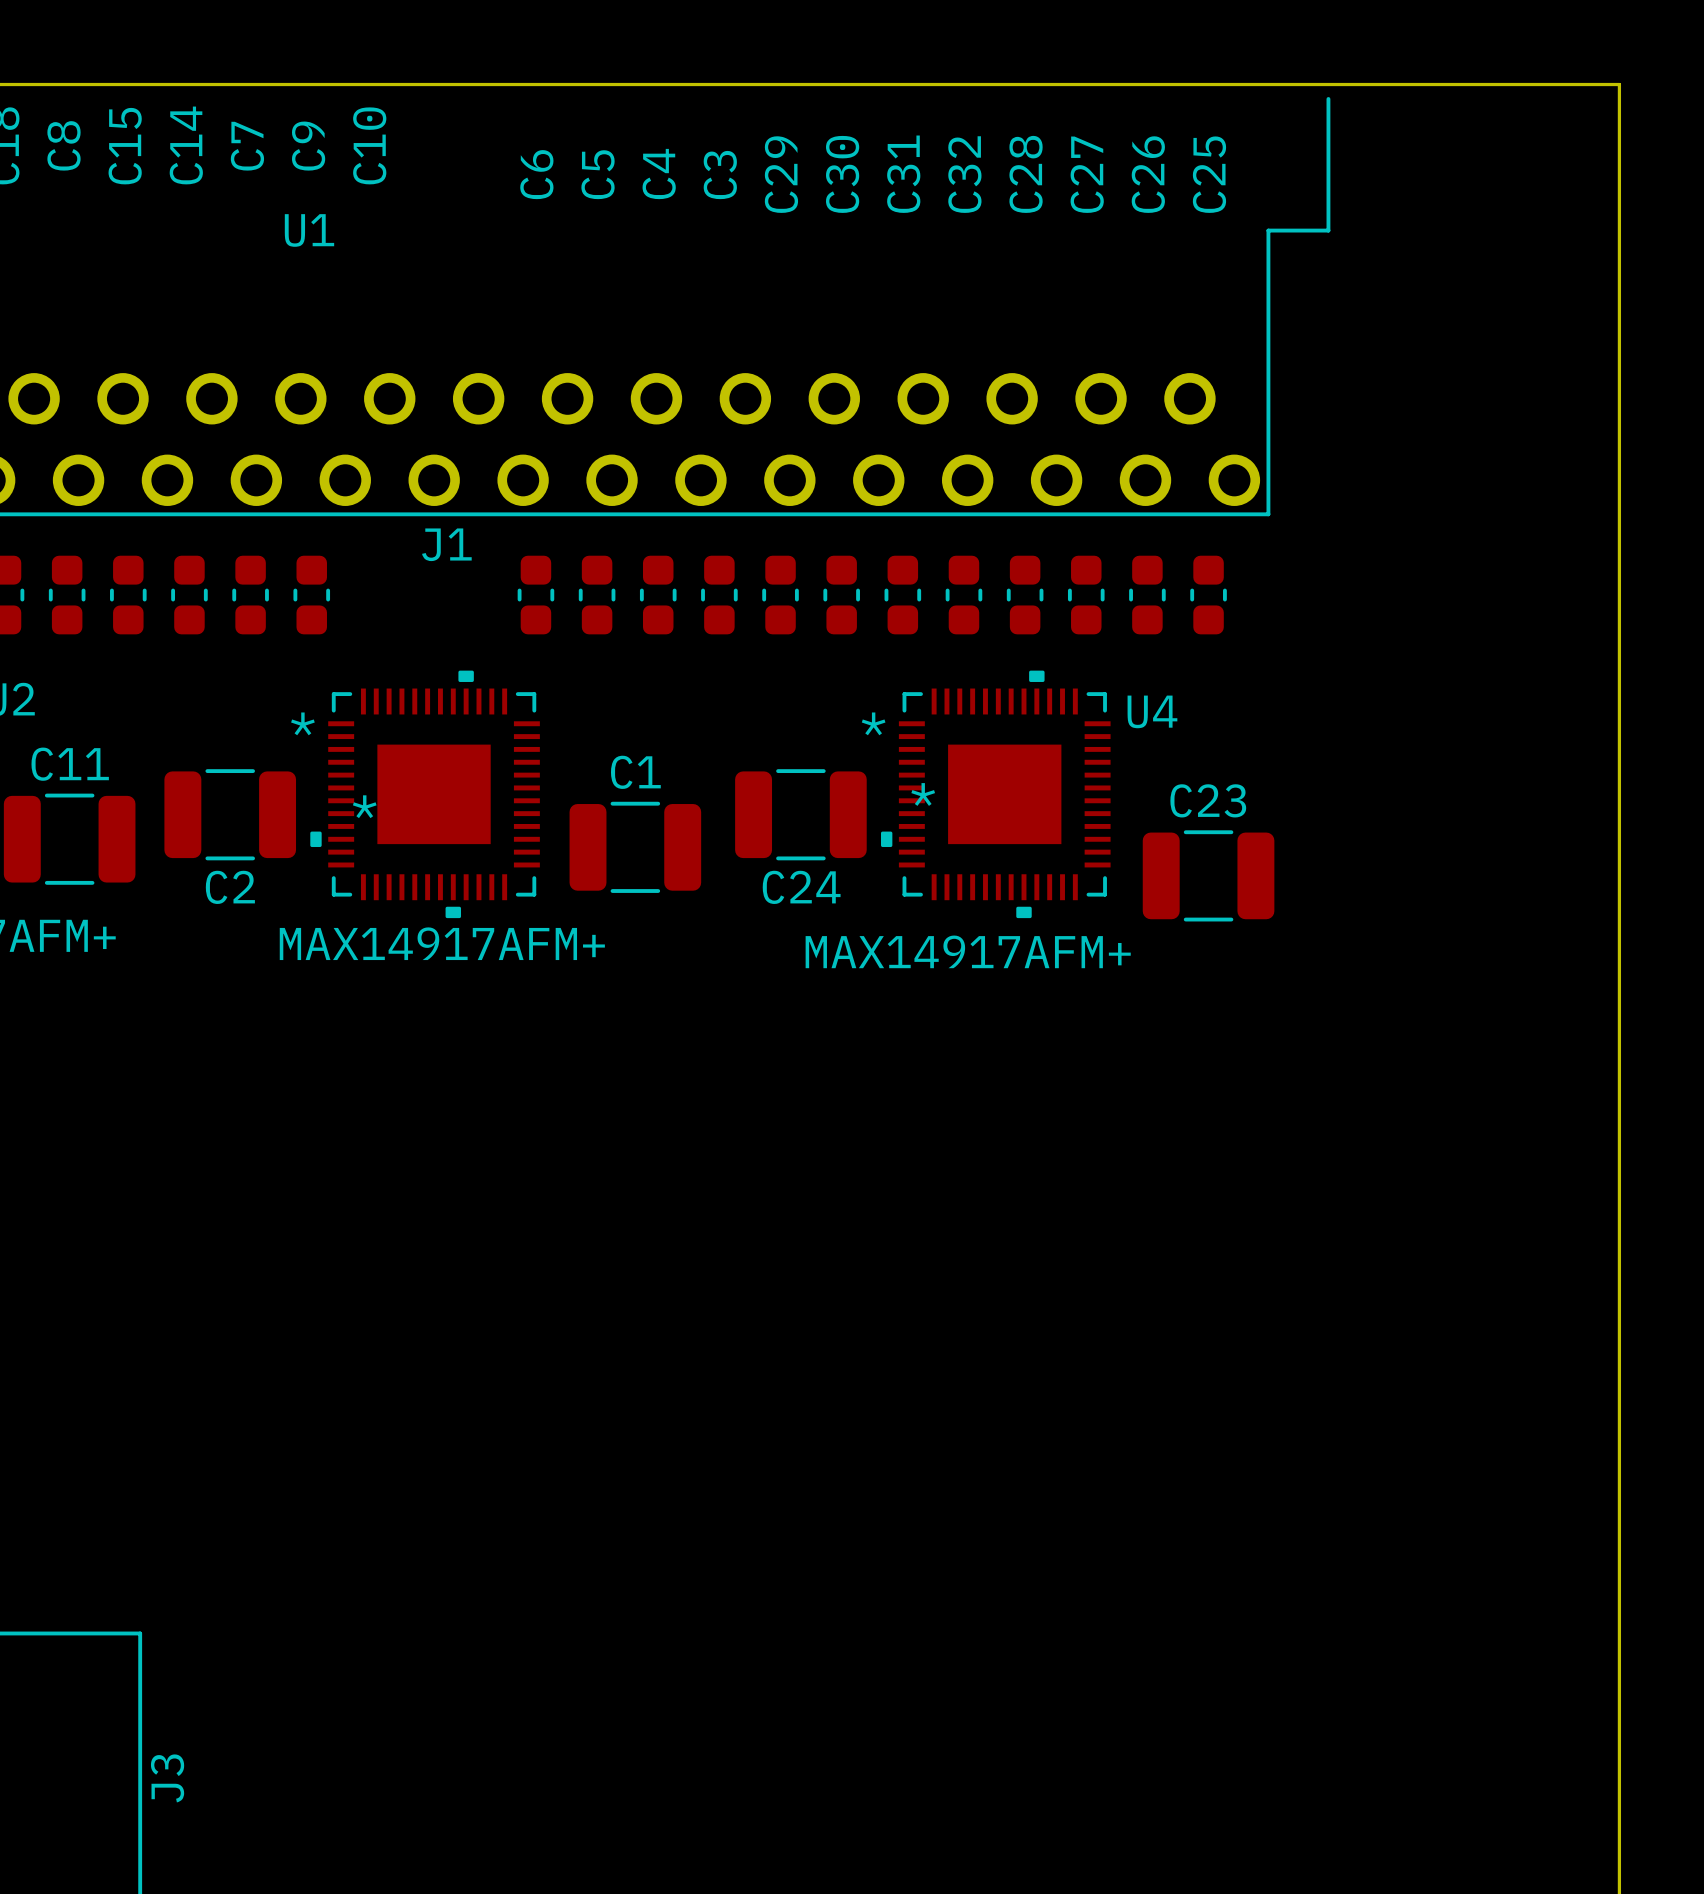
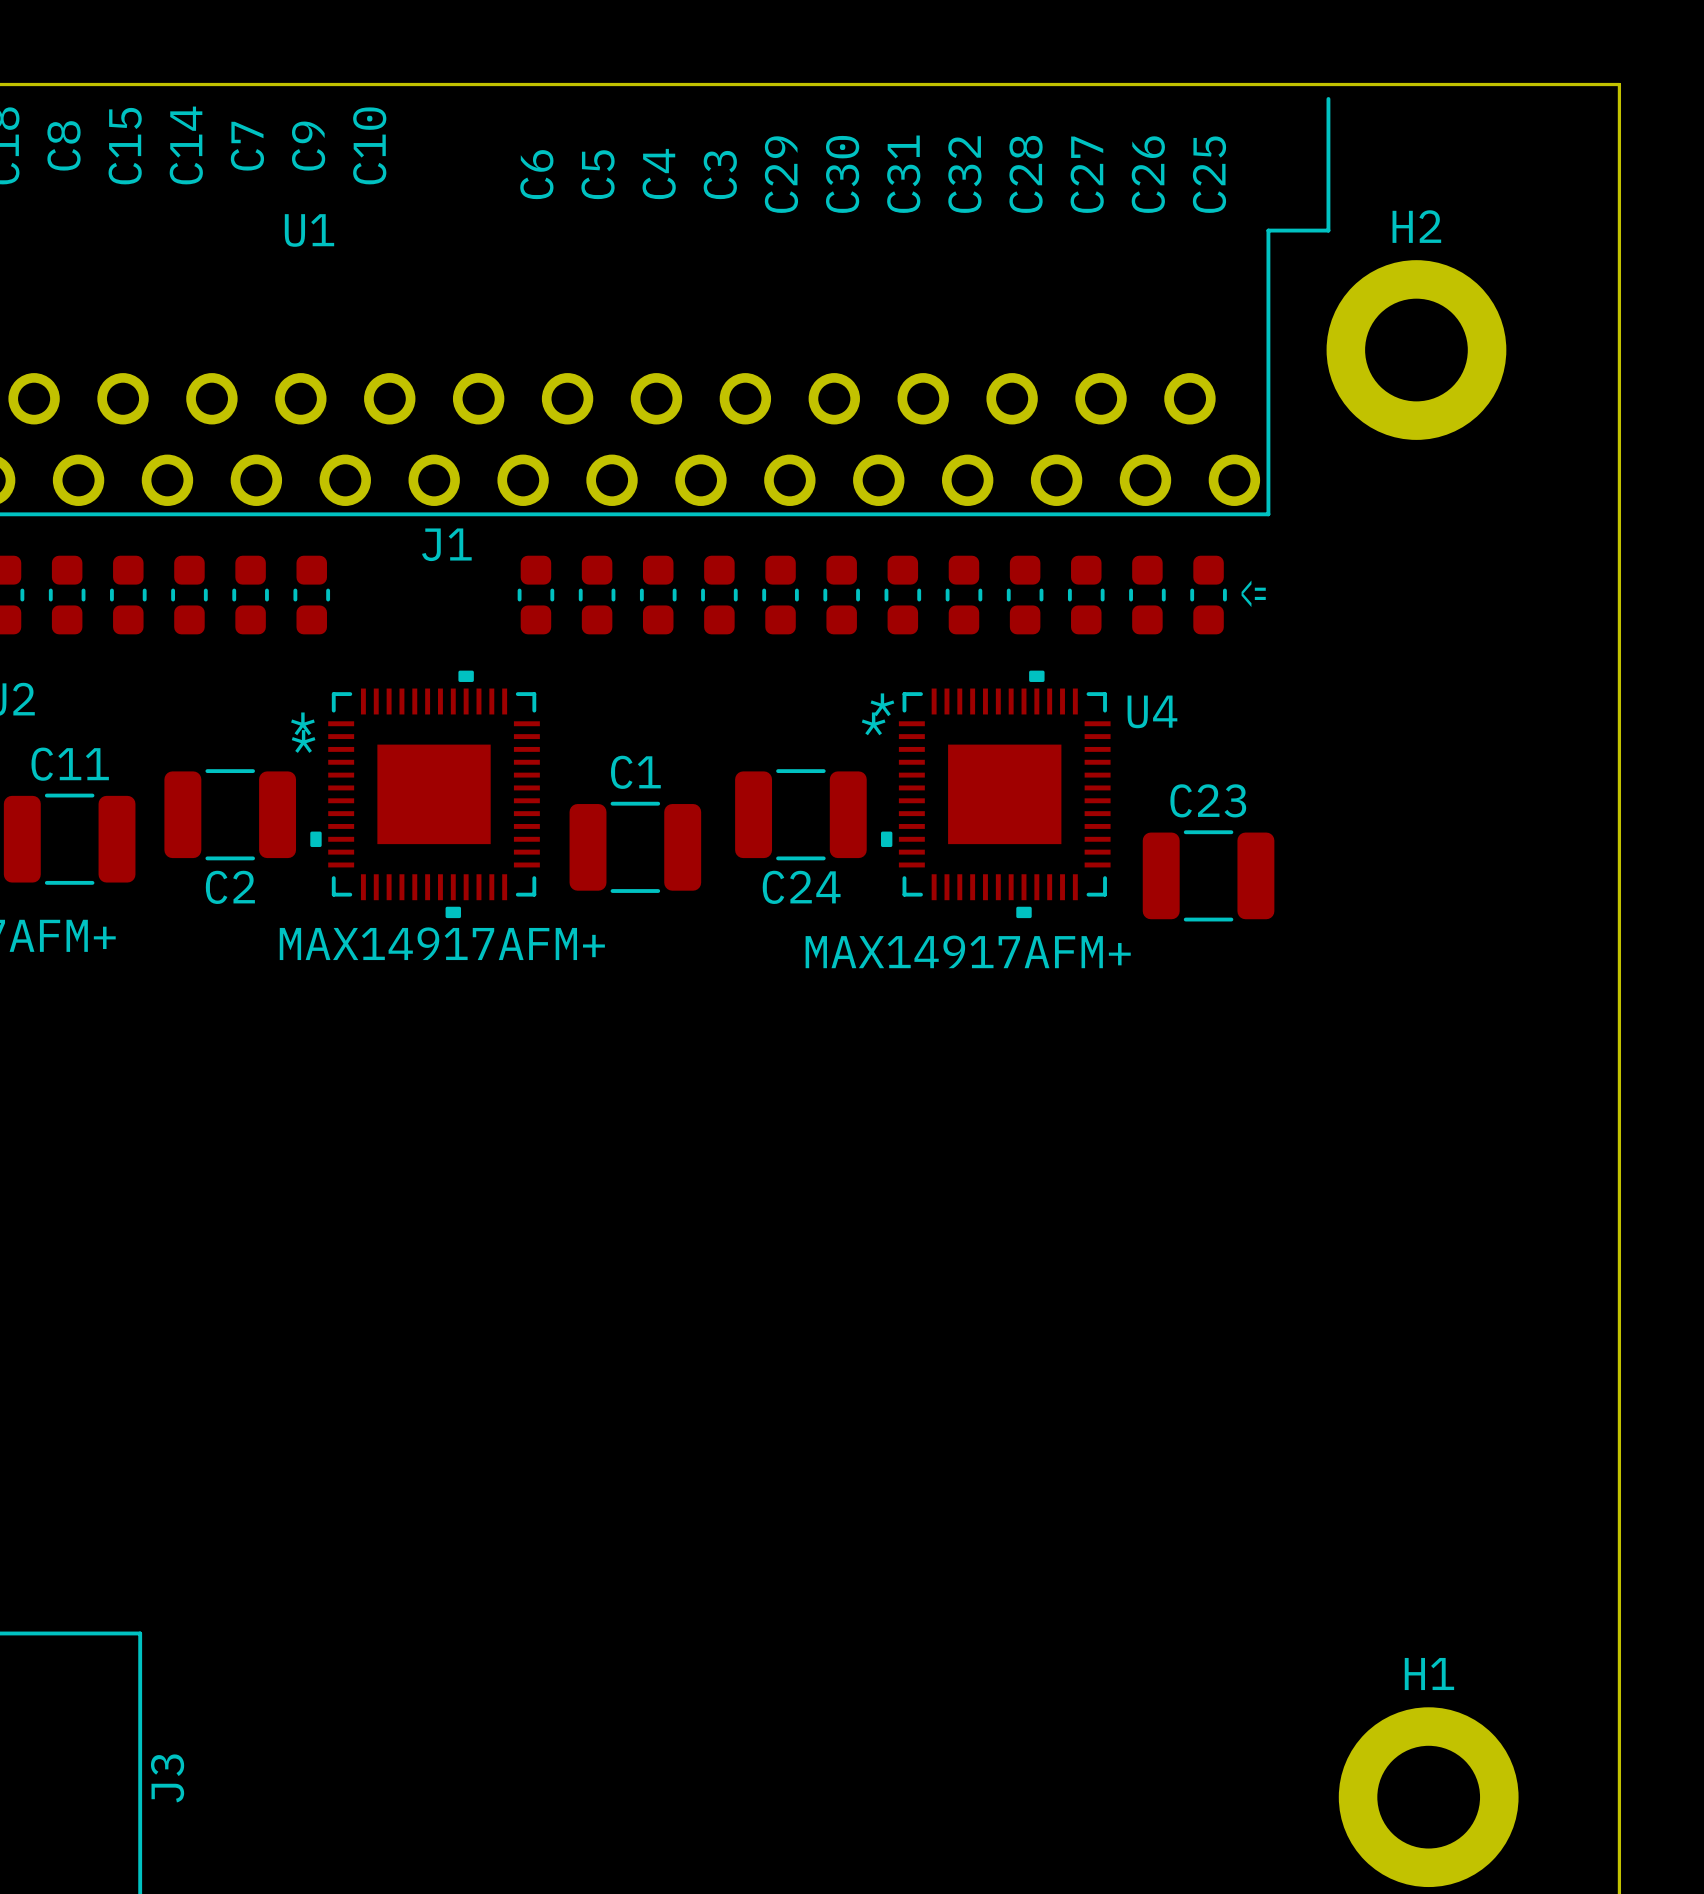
H2: none -> (1416, 350)
text: none -> => (1253, 593)
U4 text position: * (923, 794) -> * (882, 704)
U1 text position: * (364, 806) -> * (303, 741)
H1: none -> (1428, 1797)

